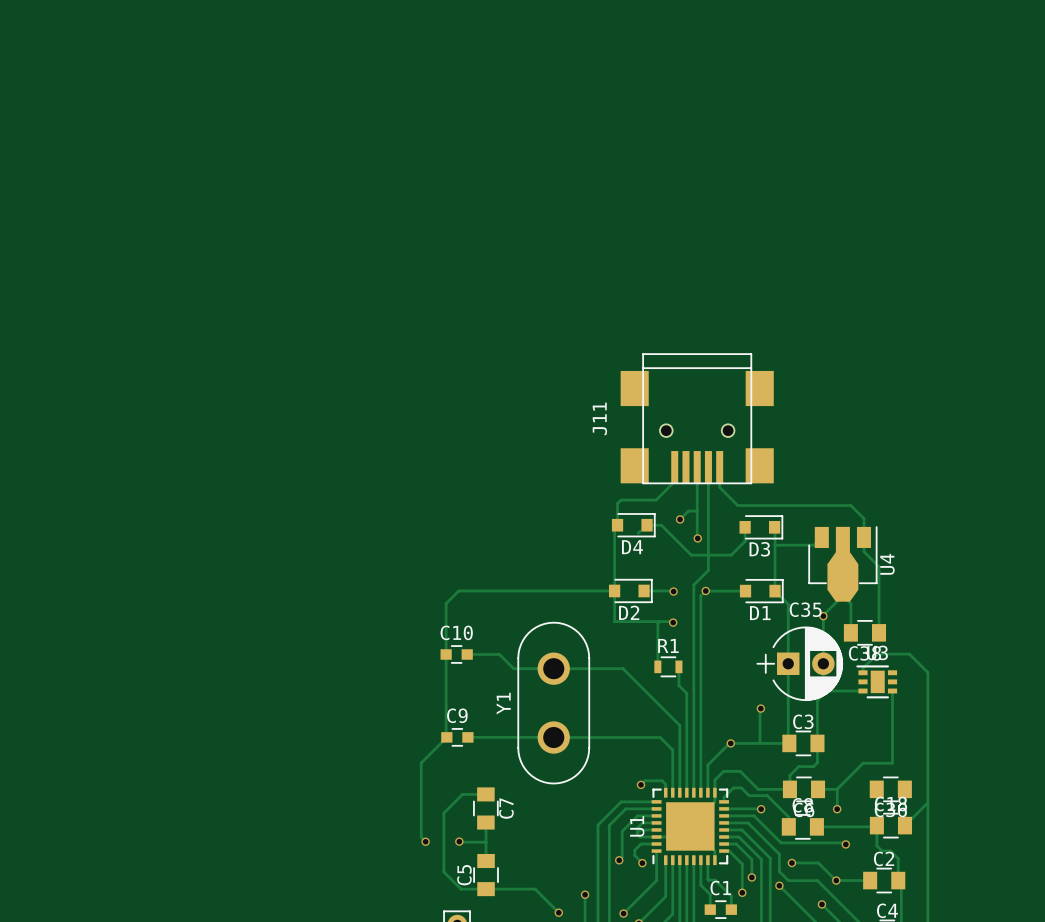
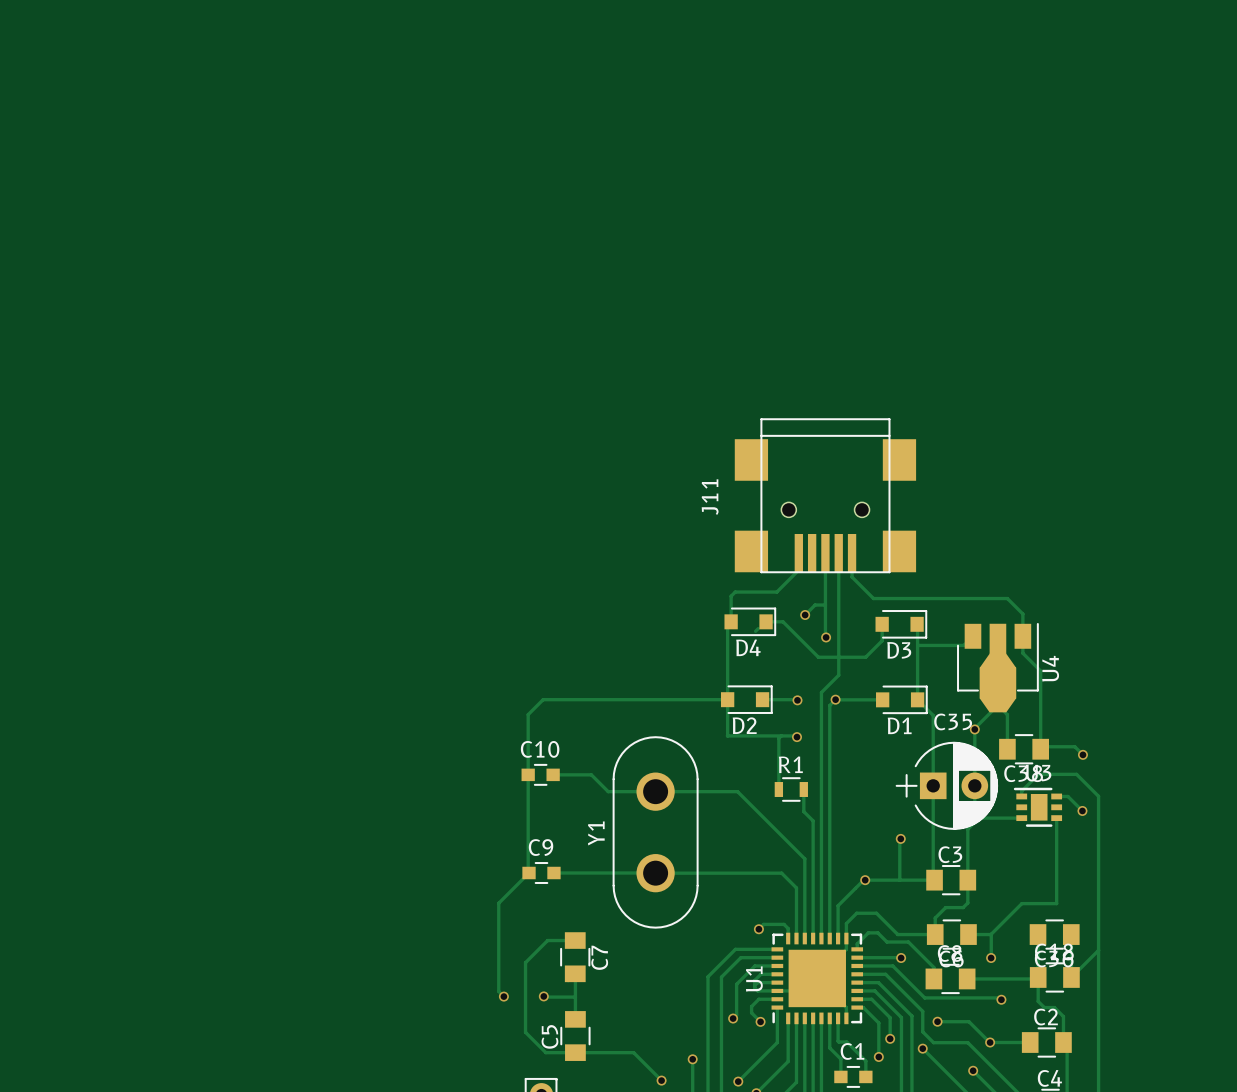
track: none -> (1040, 749) (1043, 746) (1074, 746) (1082, 754)
via: none -> (1082, 754)
track: none -> (1056, 796) (1067, 796) (1082, 810)
via: none -> (1082, 810)

